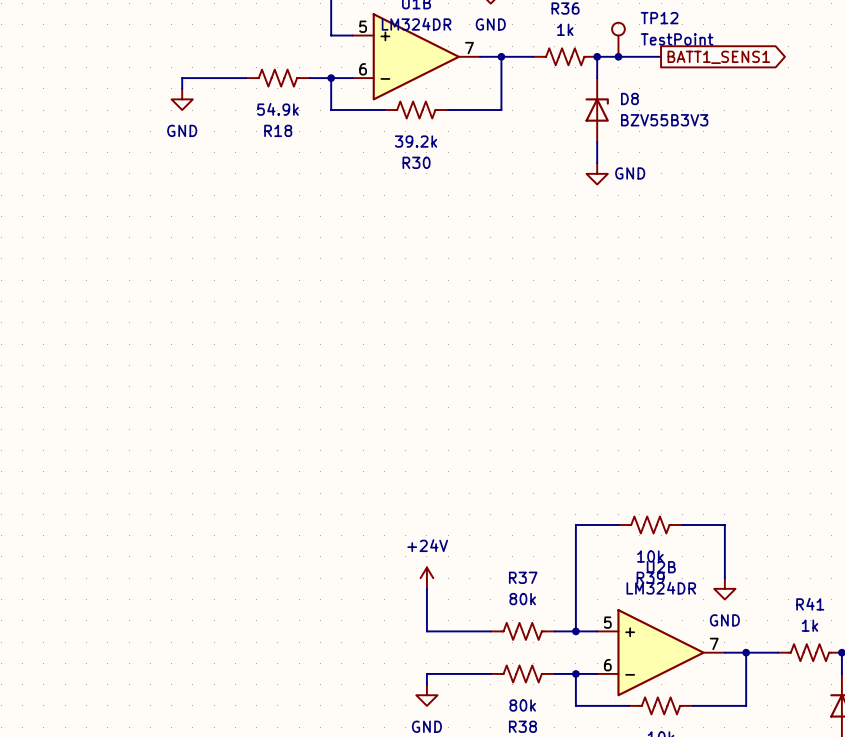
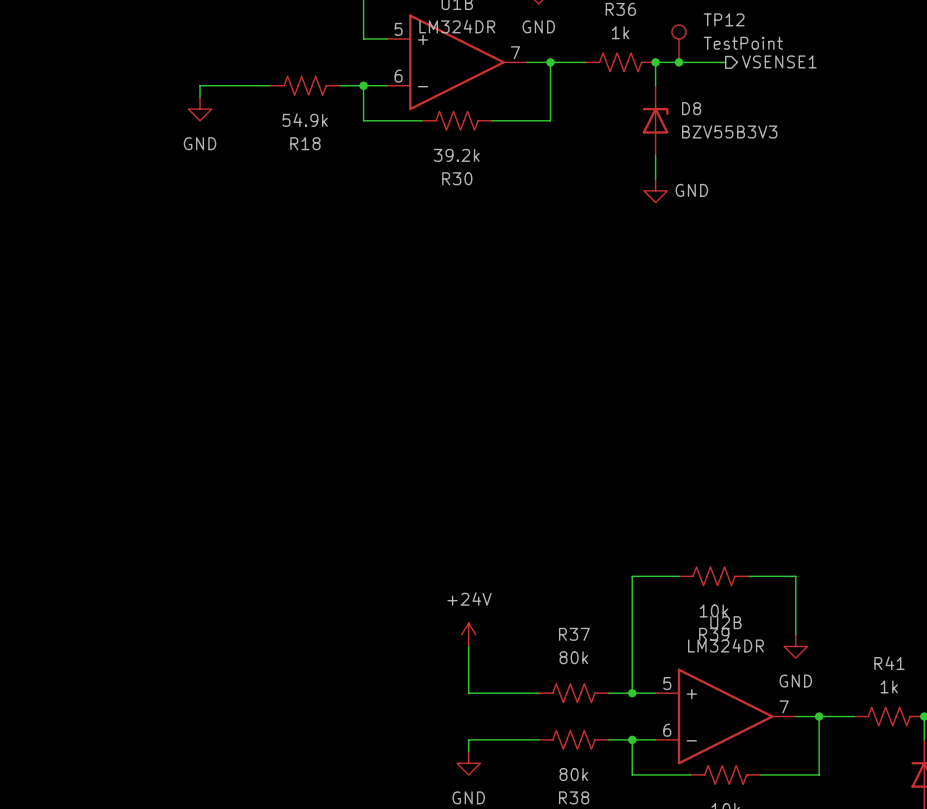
hierarchical label: none -> VSENSE1 (779, 61)
global label: BATT1_SENS1 (718, 57) -> none

